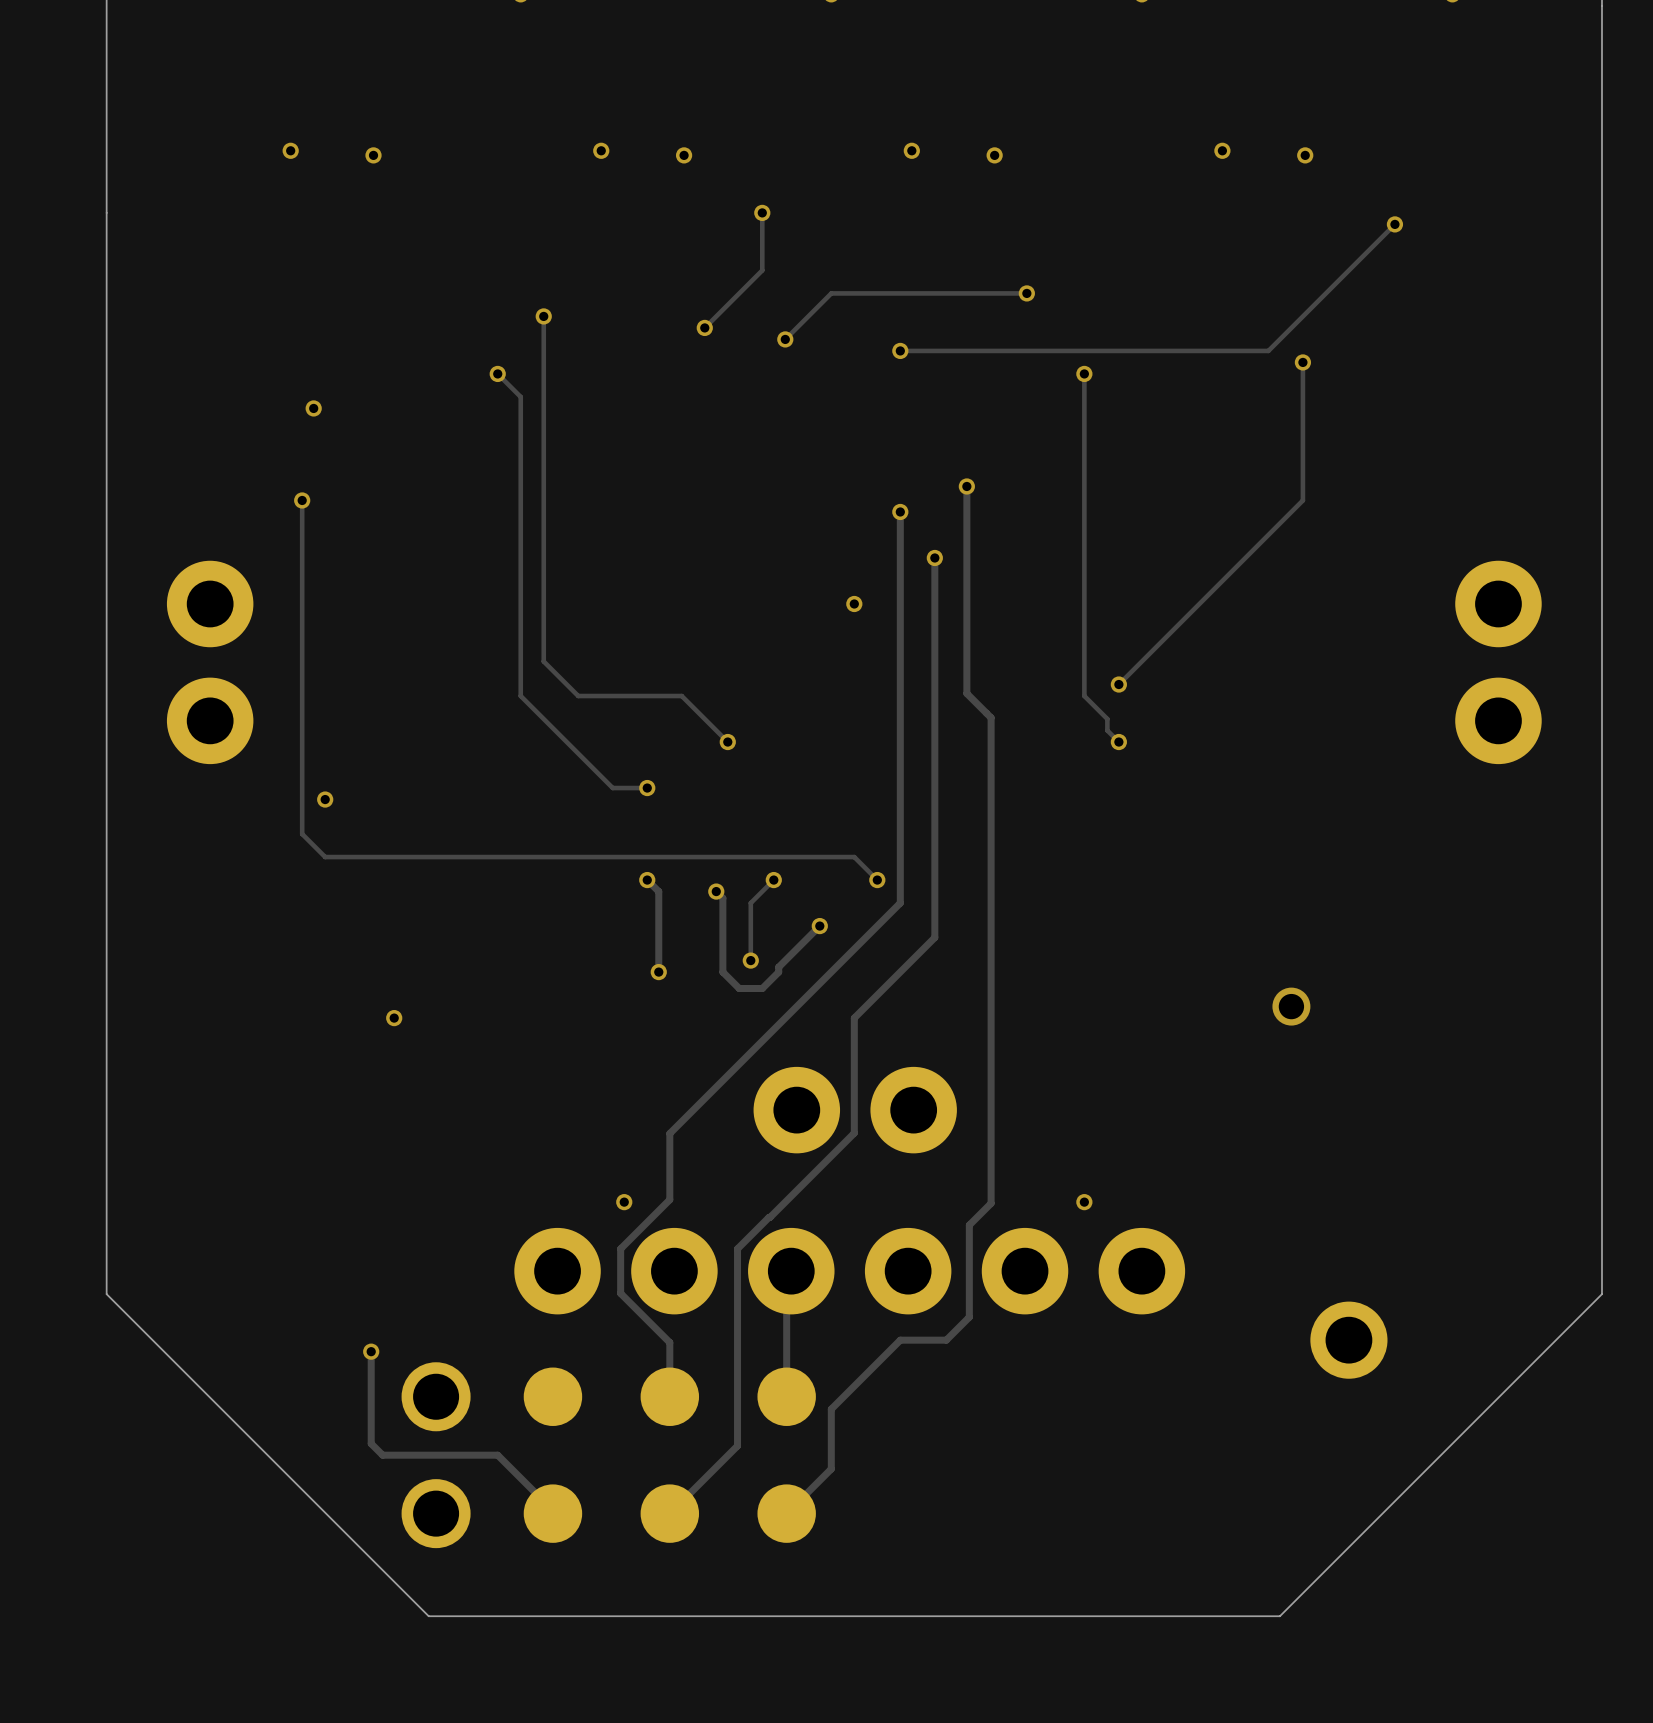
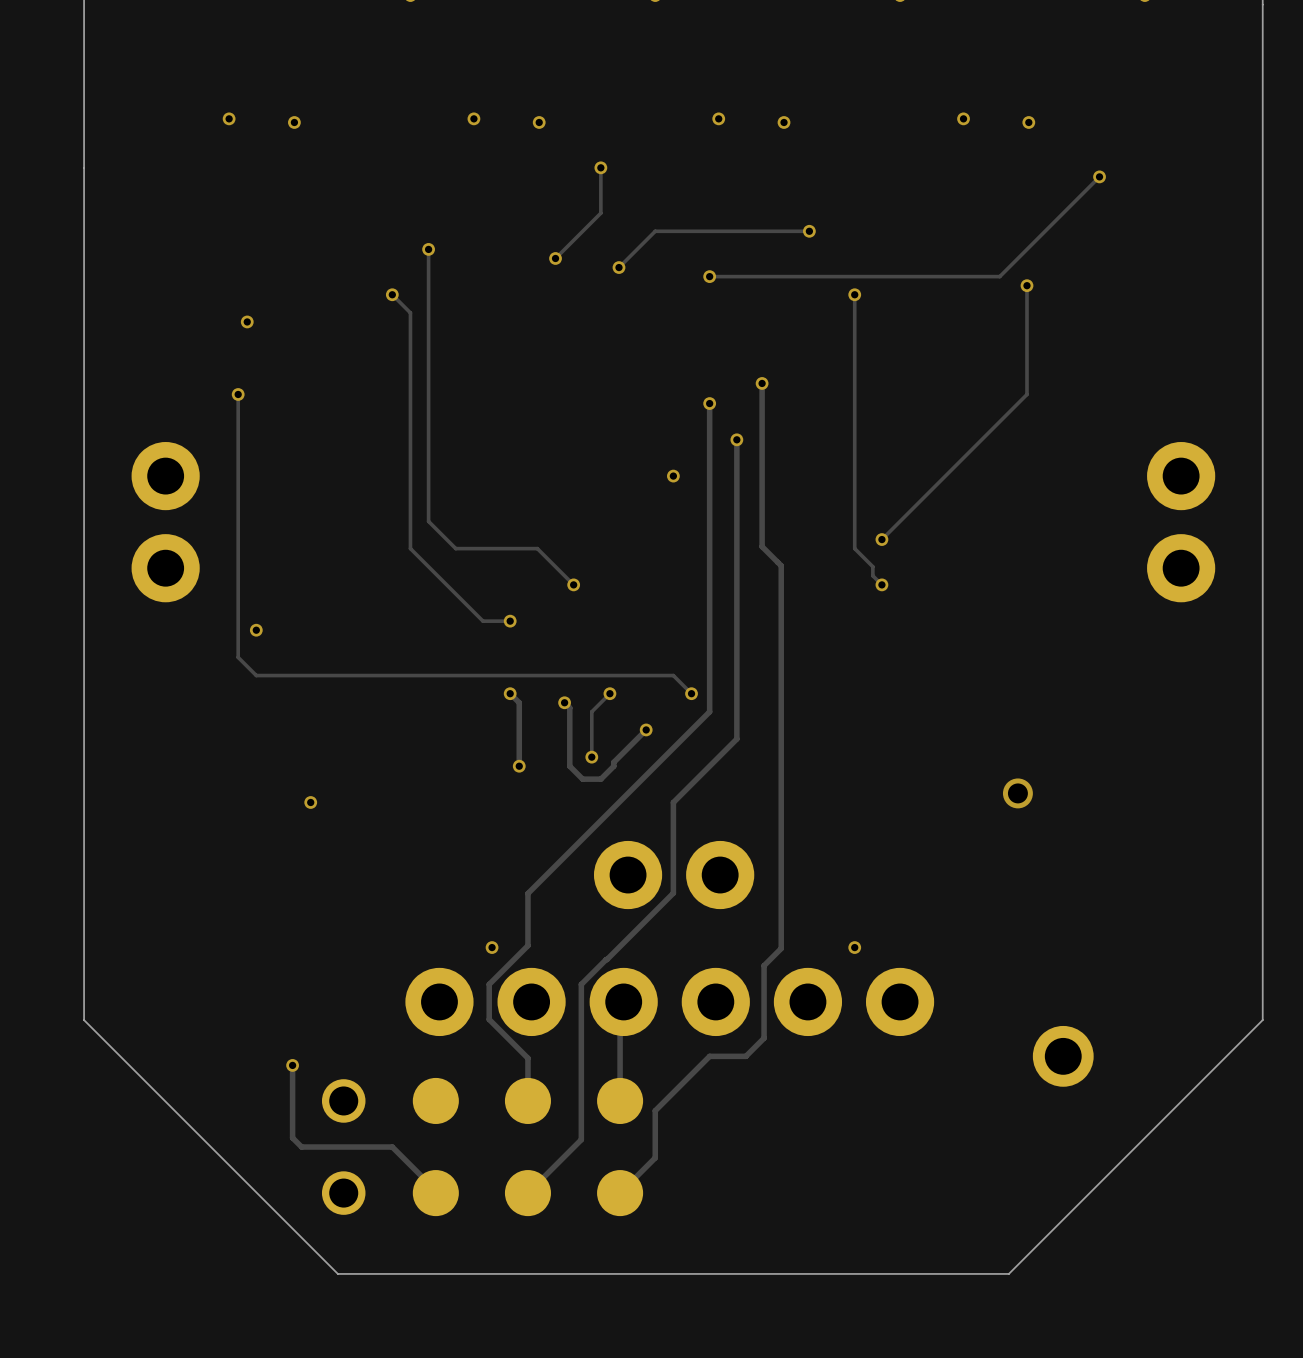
part footprint: [401, 1362, 816, 1549] -> [321, 1077, 644, 1217]

